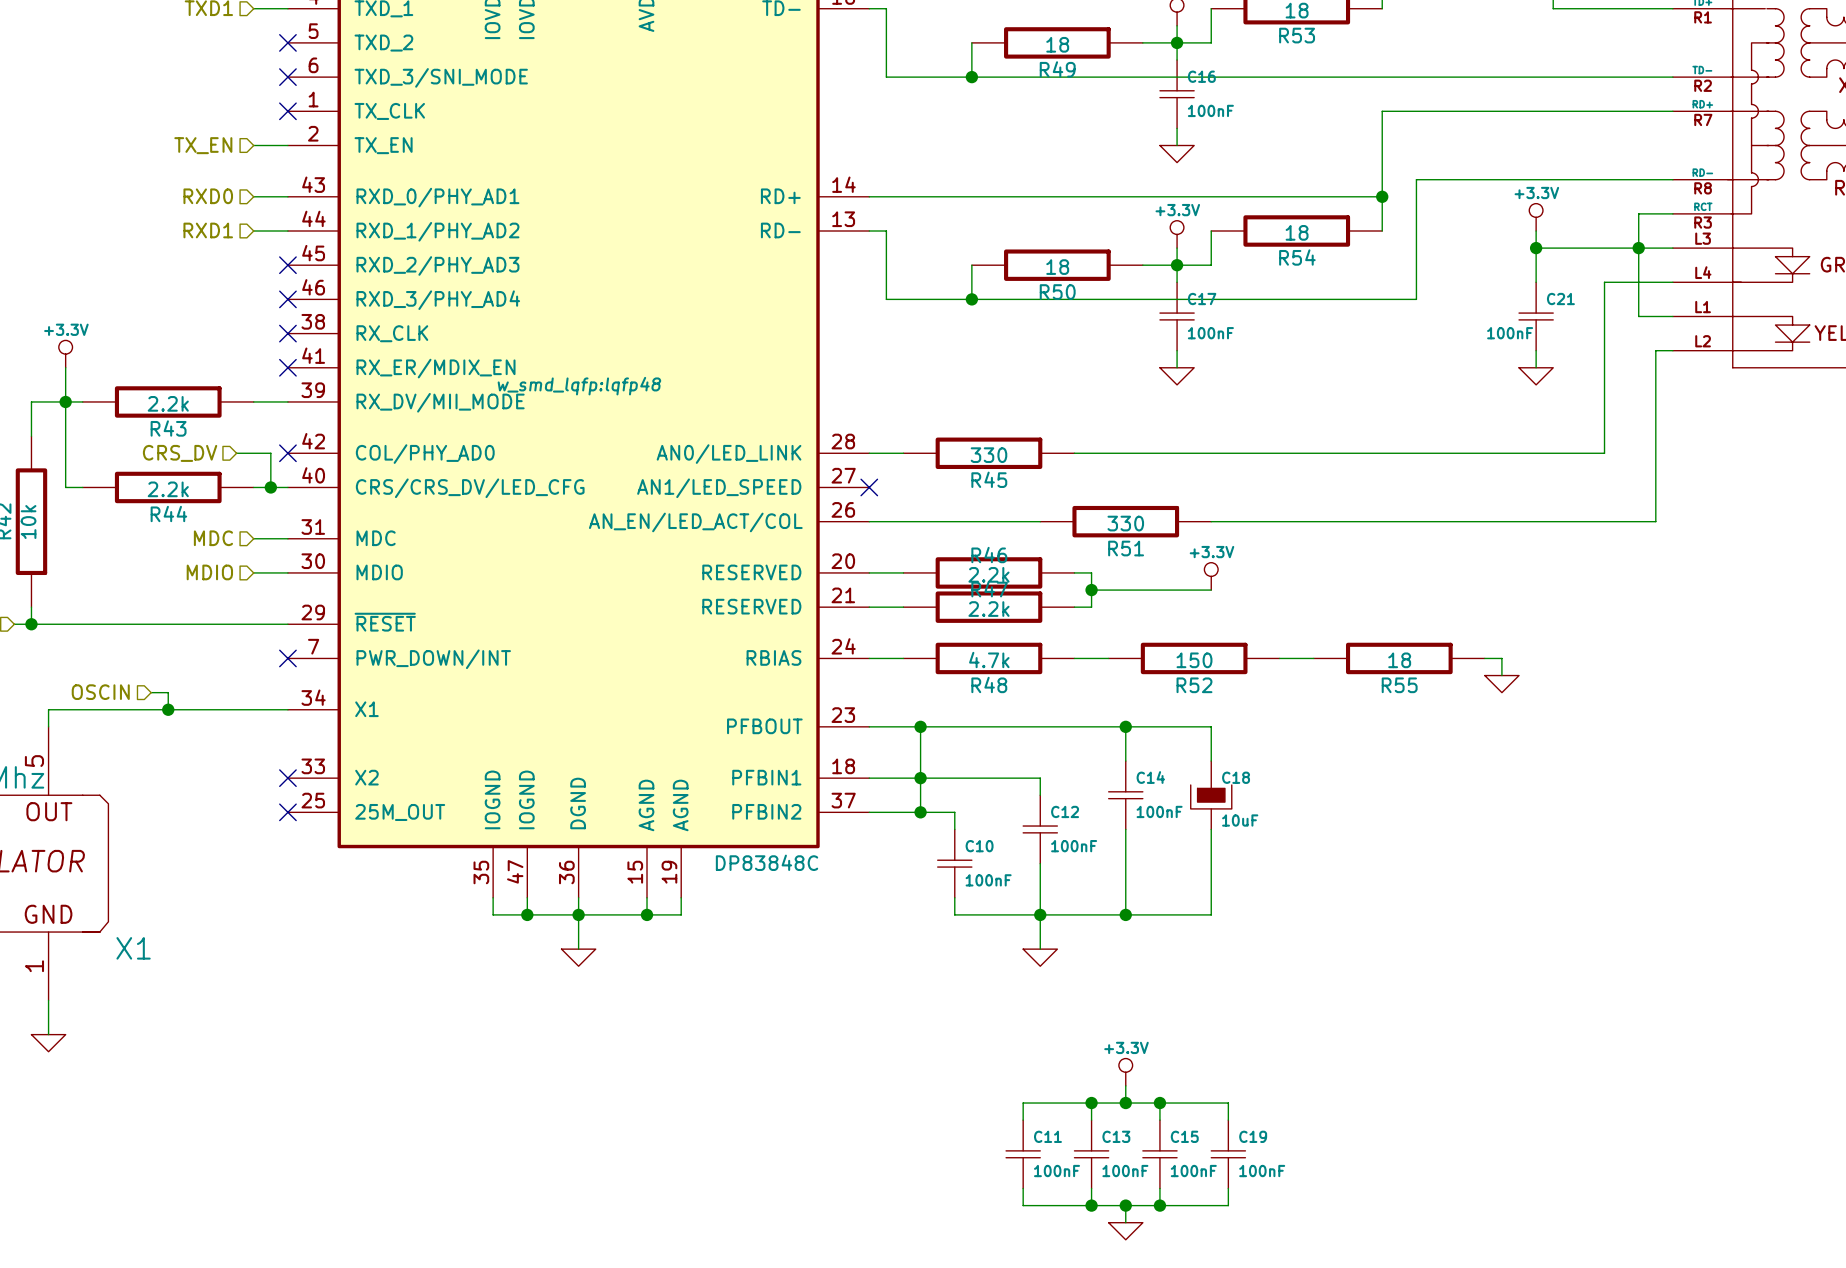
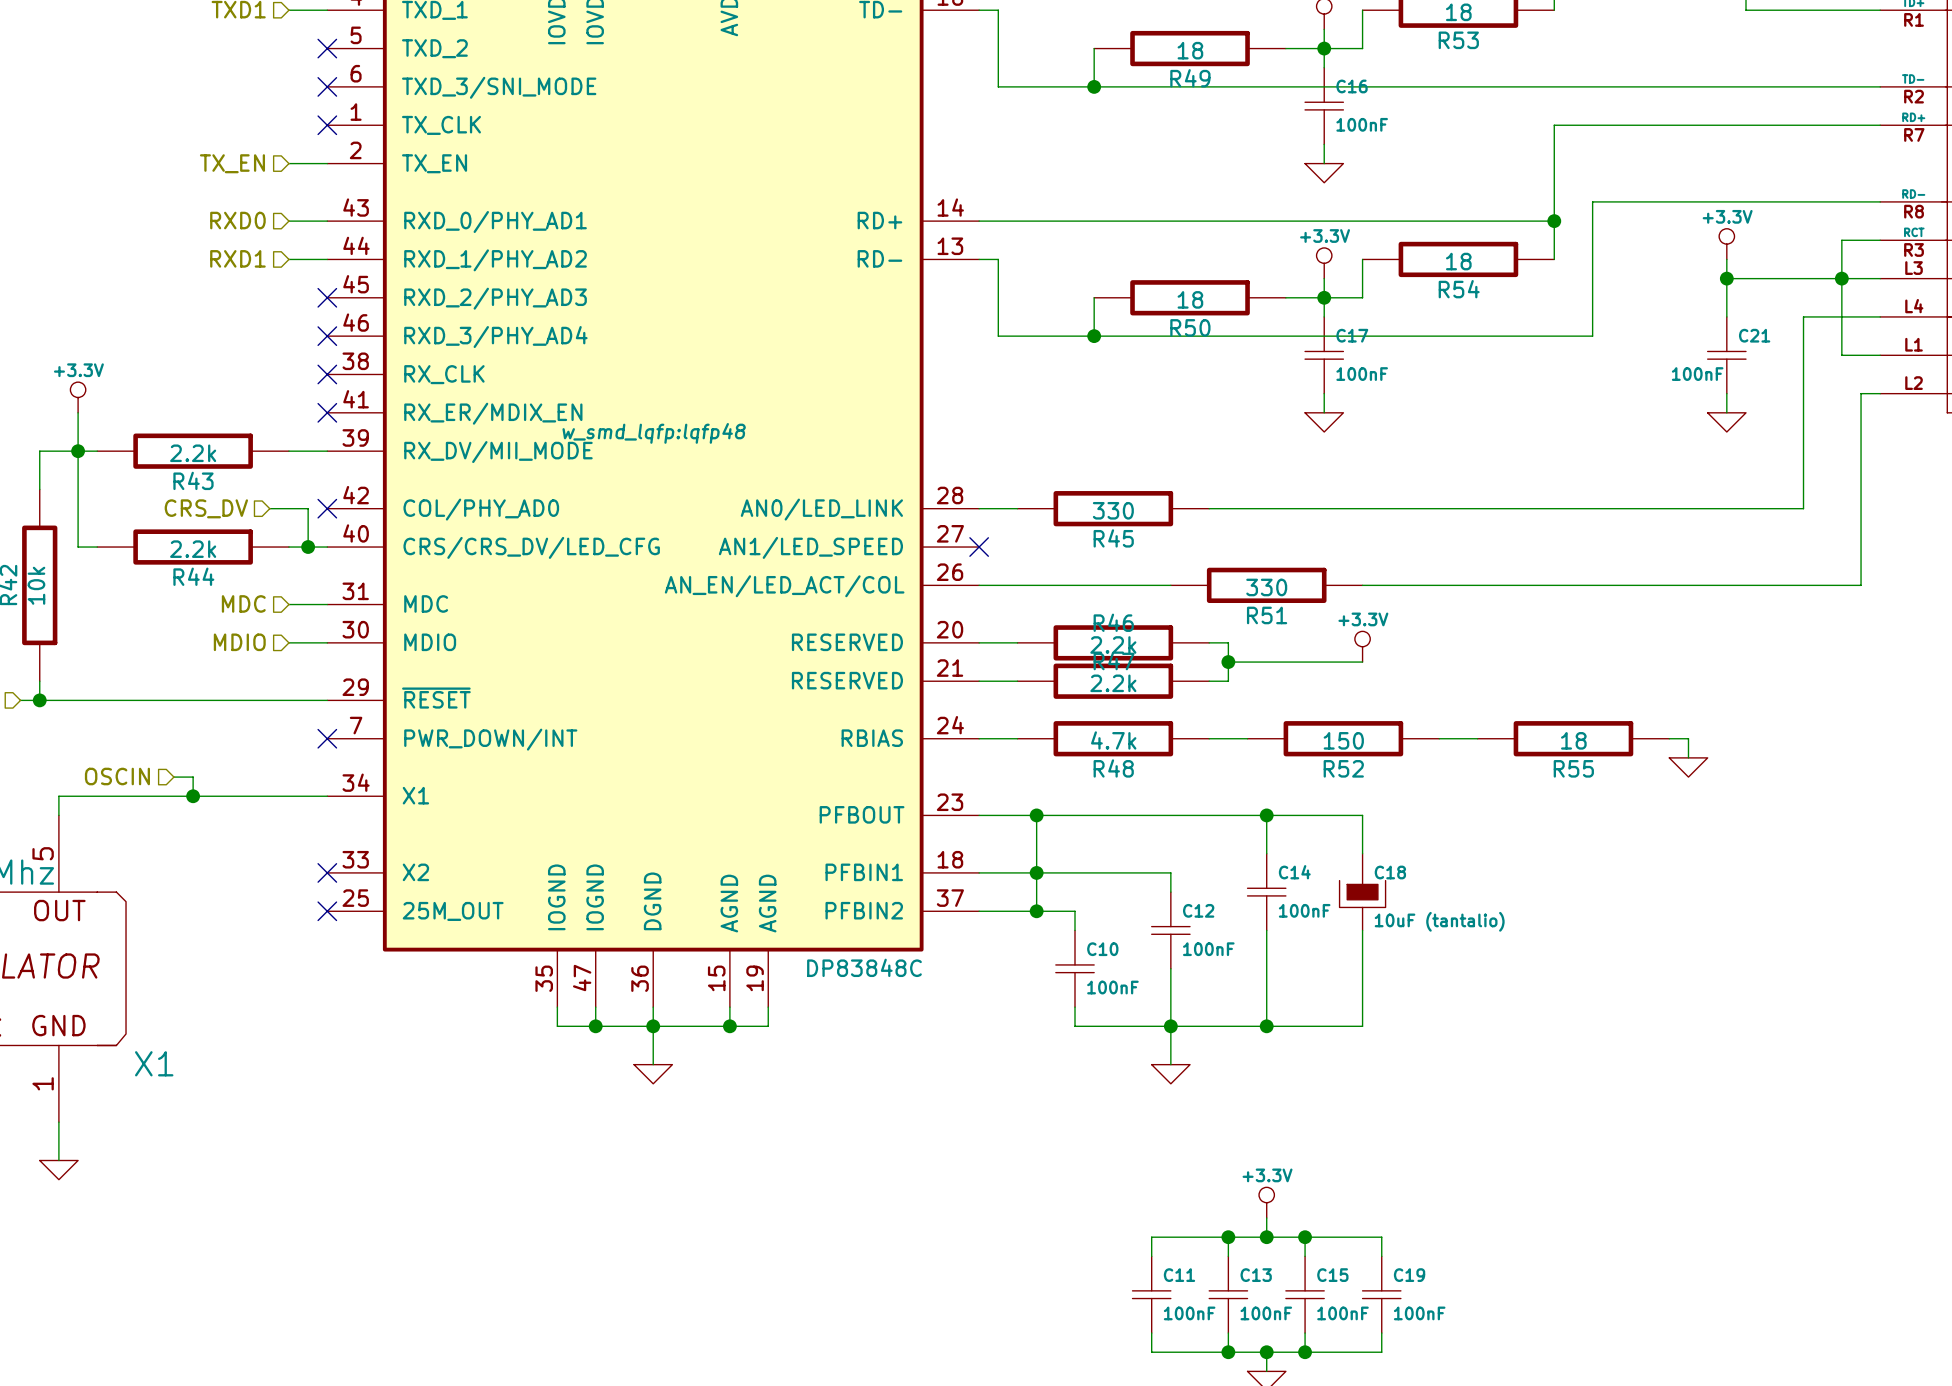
C18 value: 10uF (1240, 820) -> 10uF (tantalio) (1439, 921)

